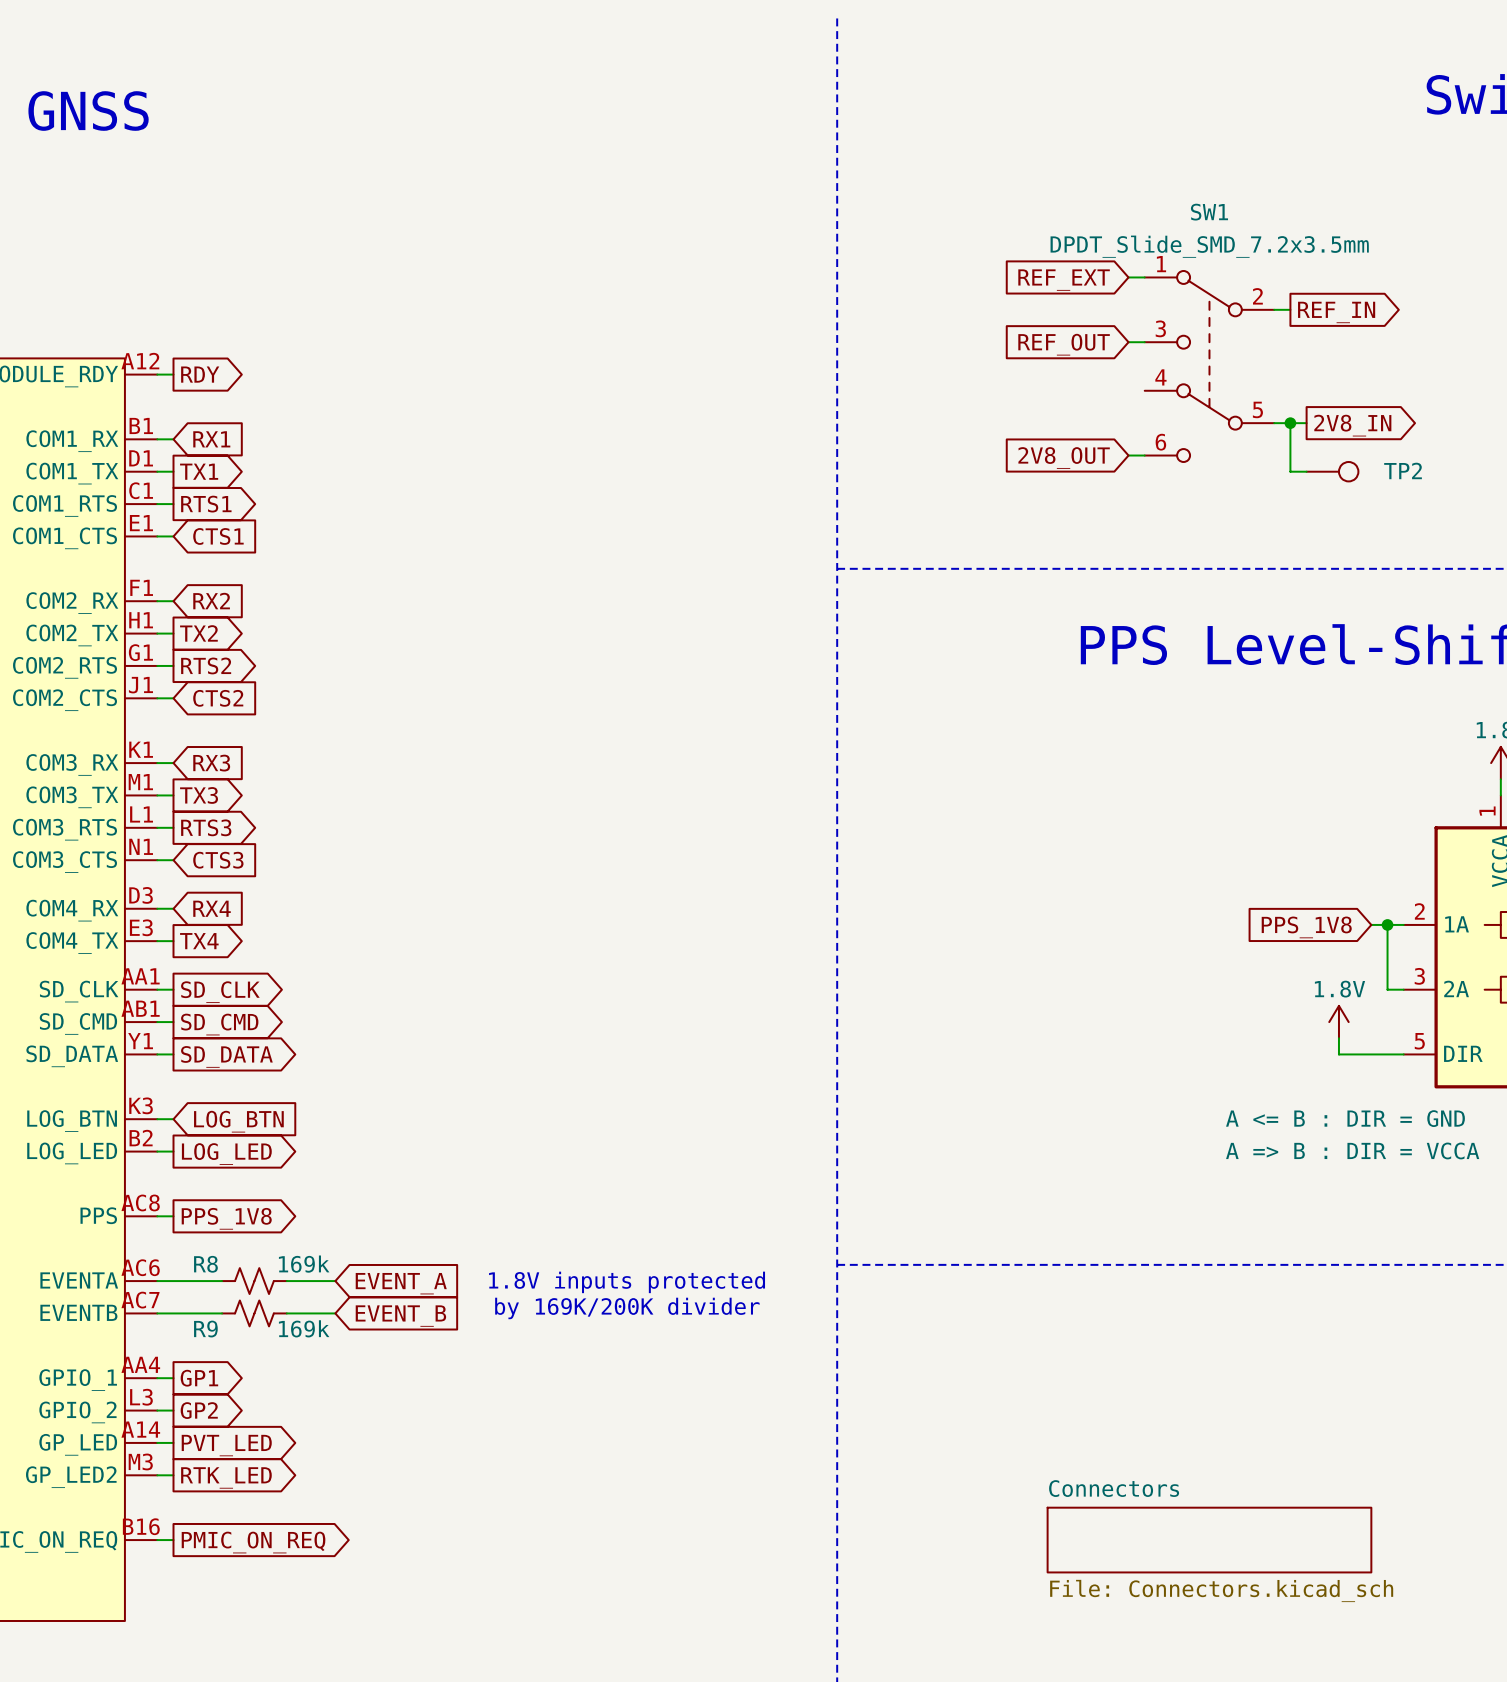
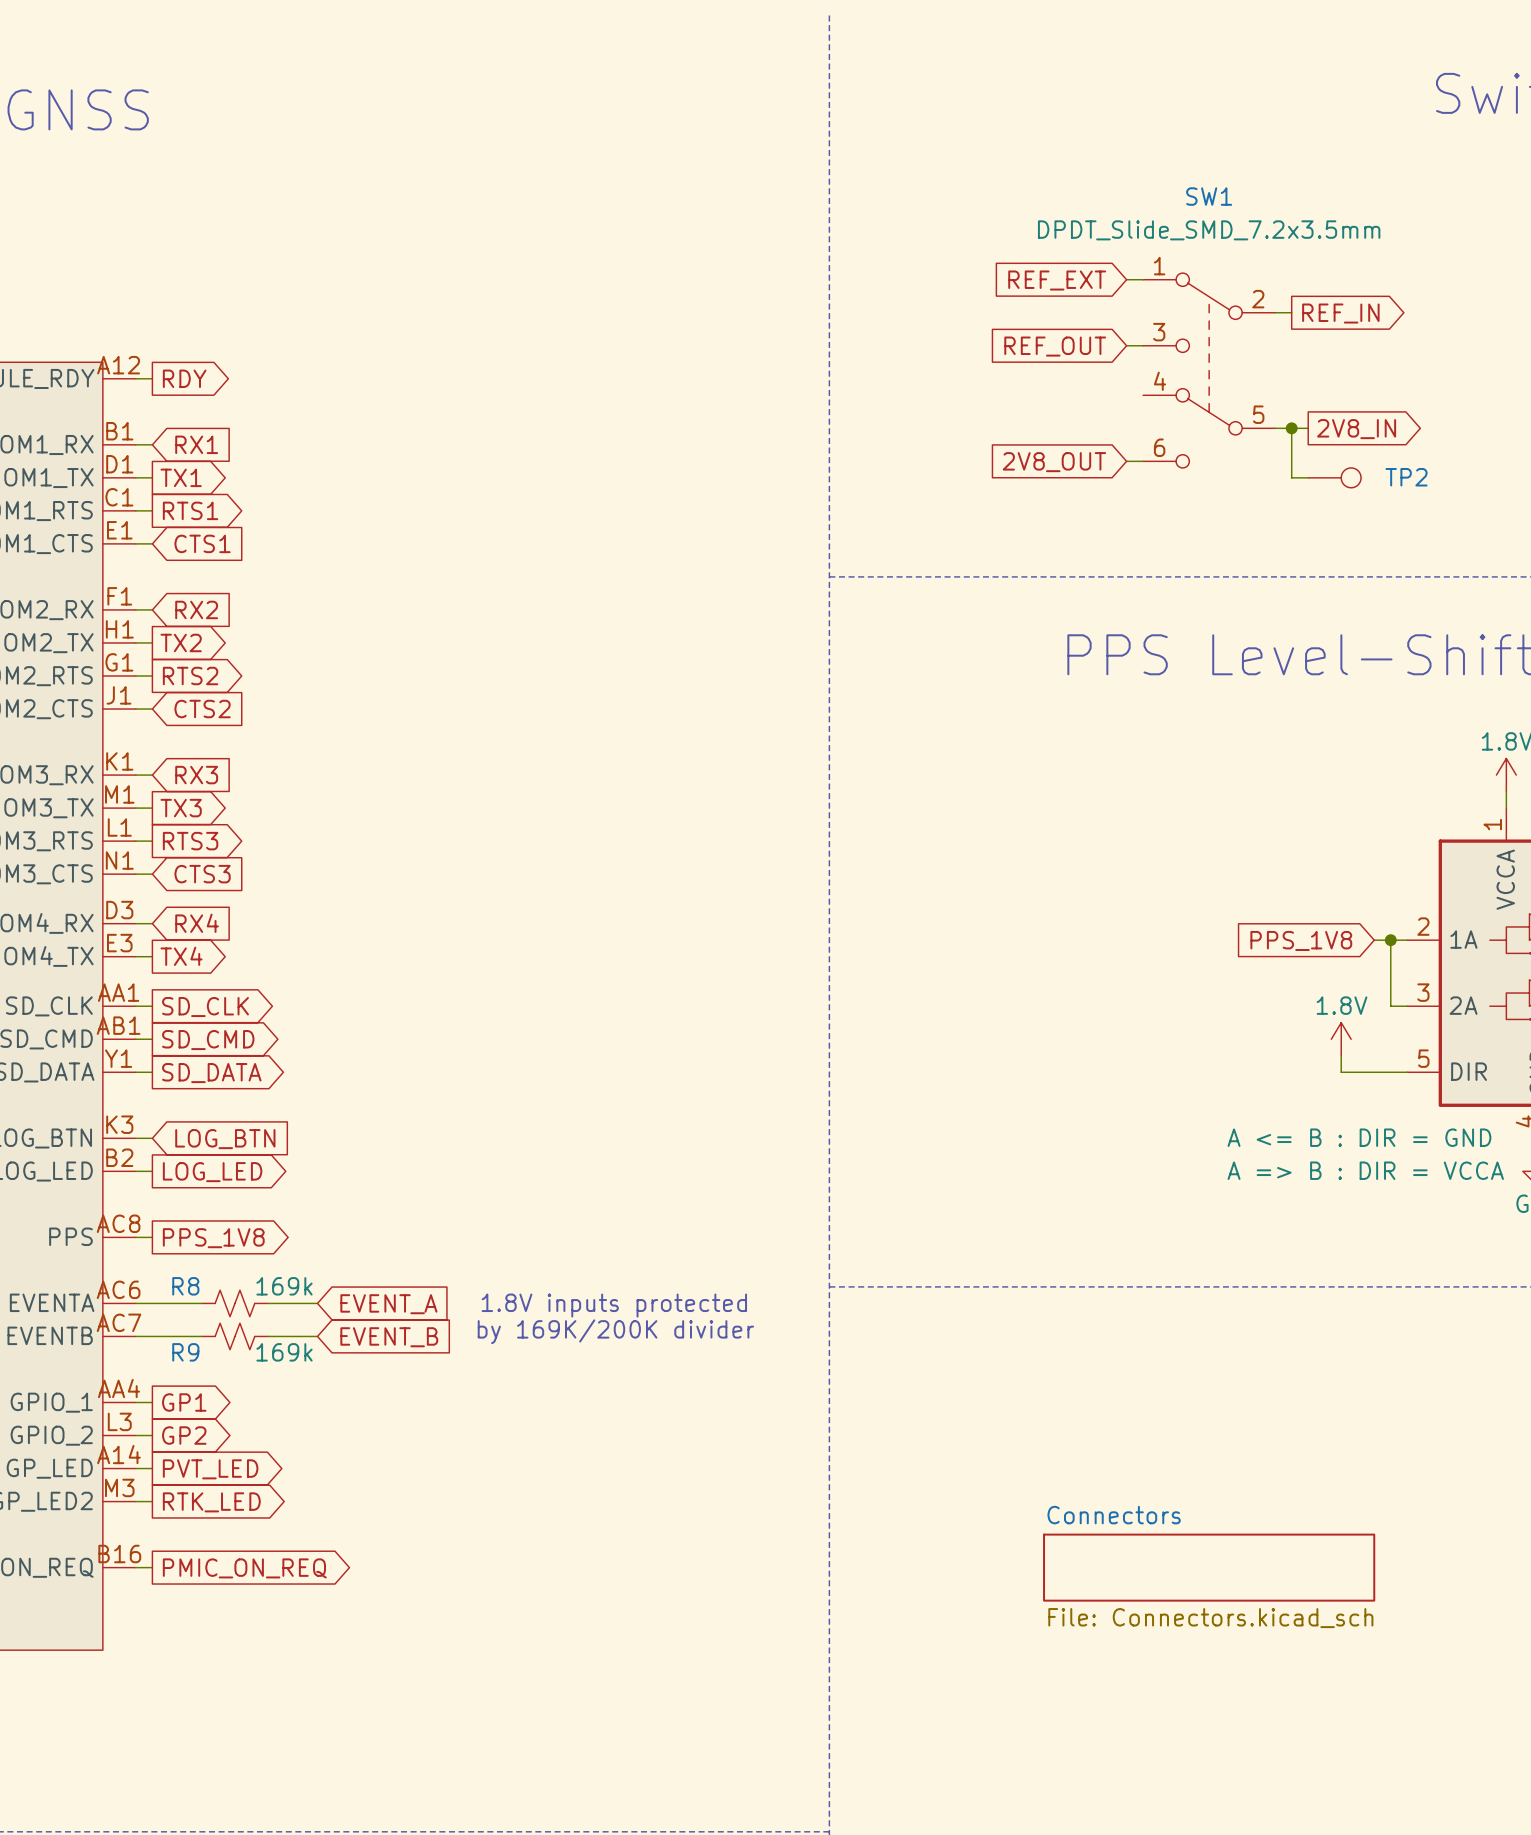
SW1 name position: SW1 (1209, 212) -> SW1 (1209, 196)
SW1 value position: DPDT_Slide_SMD_7.2x3.5mm (1209, 246) -> DPDT_Slide_SMD_7.2x3.5mm (1209, 230)

